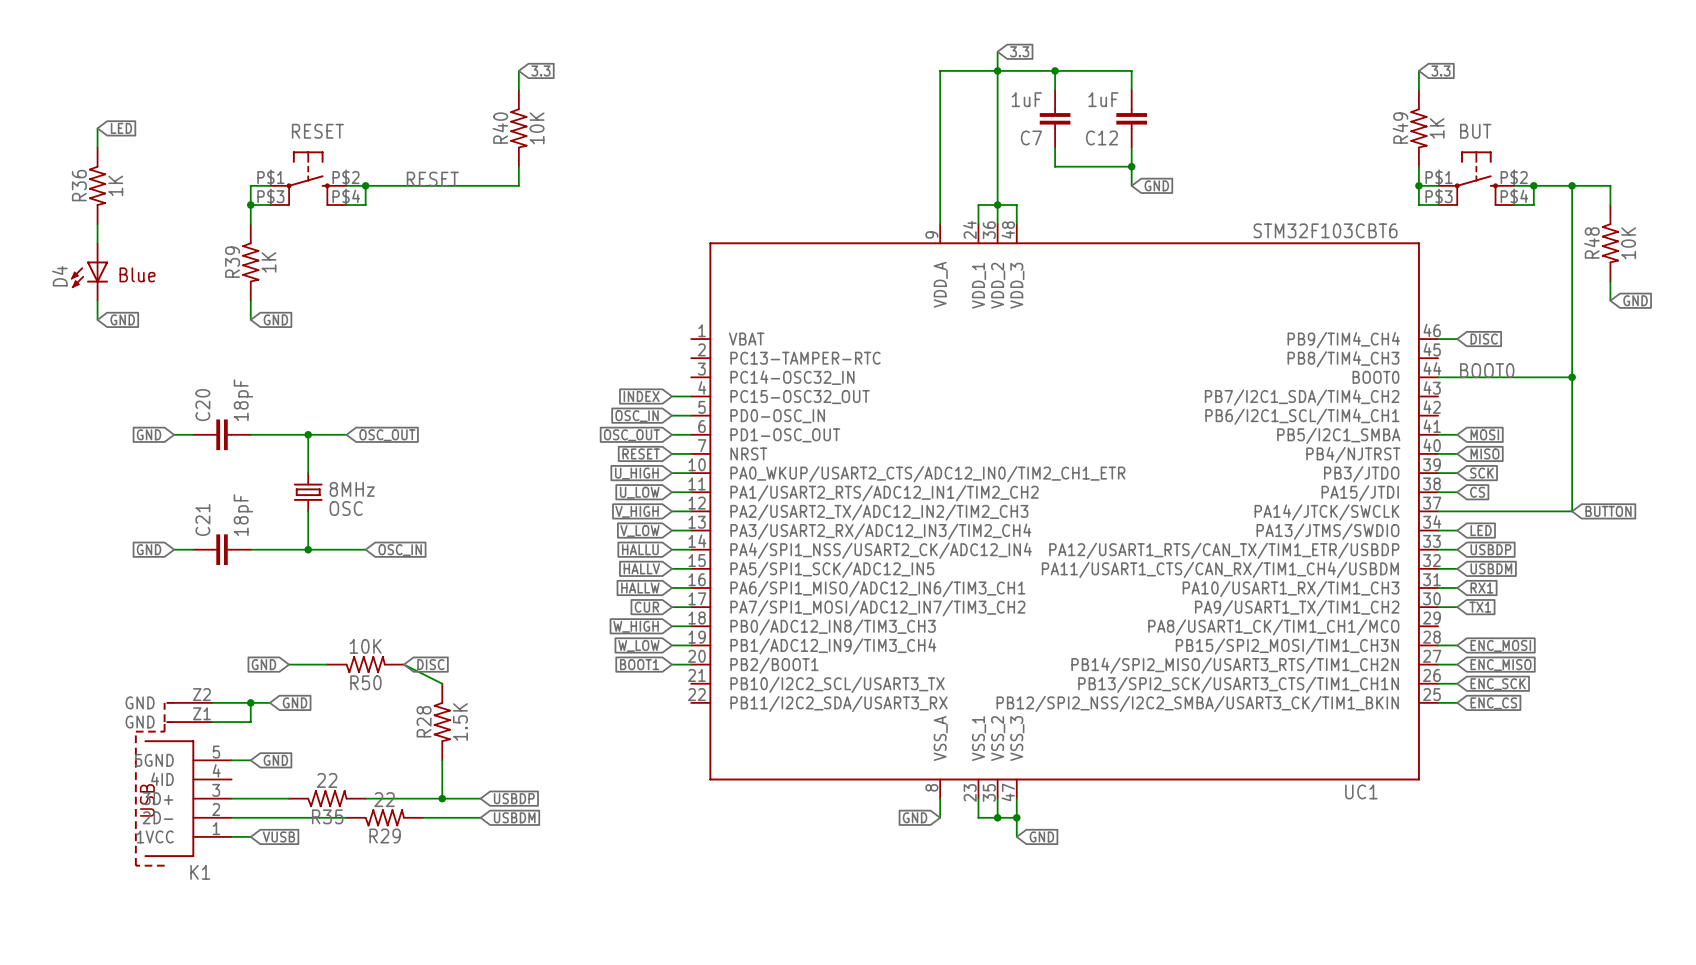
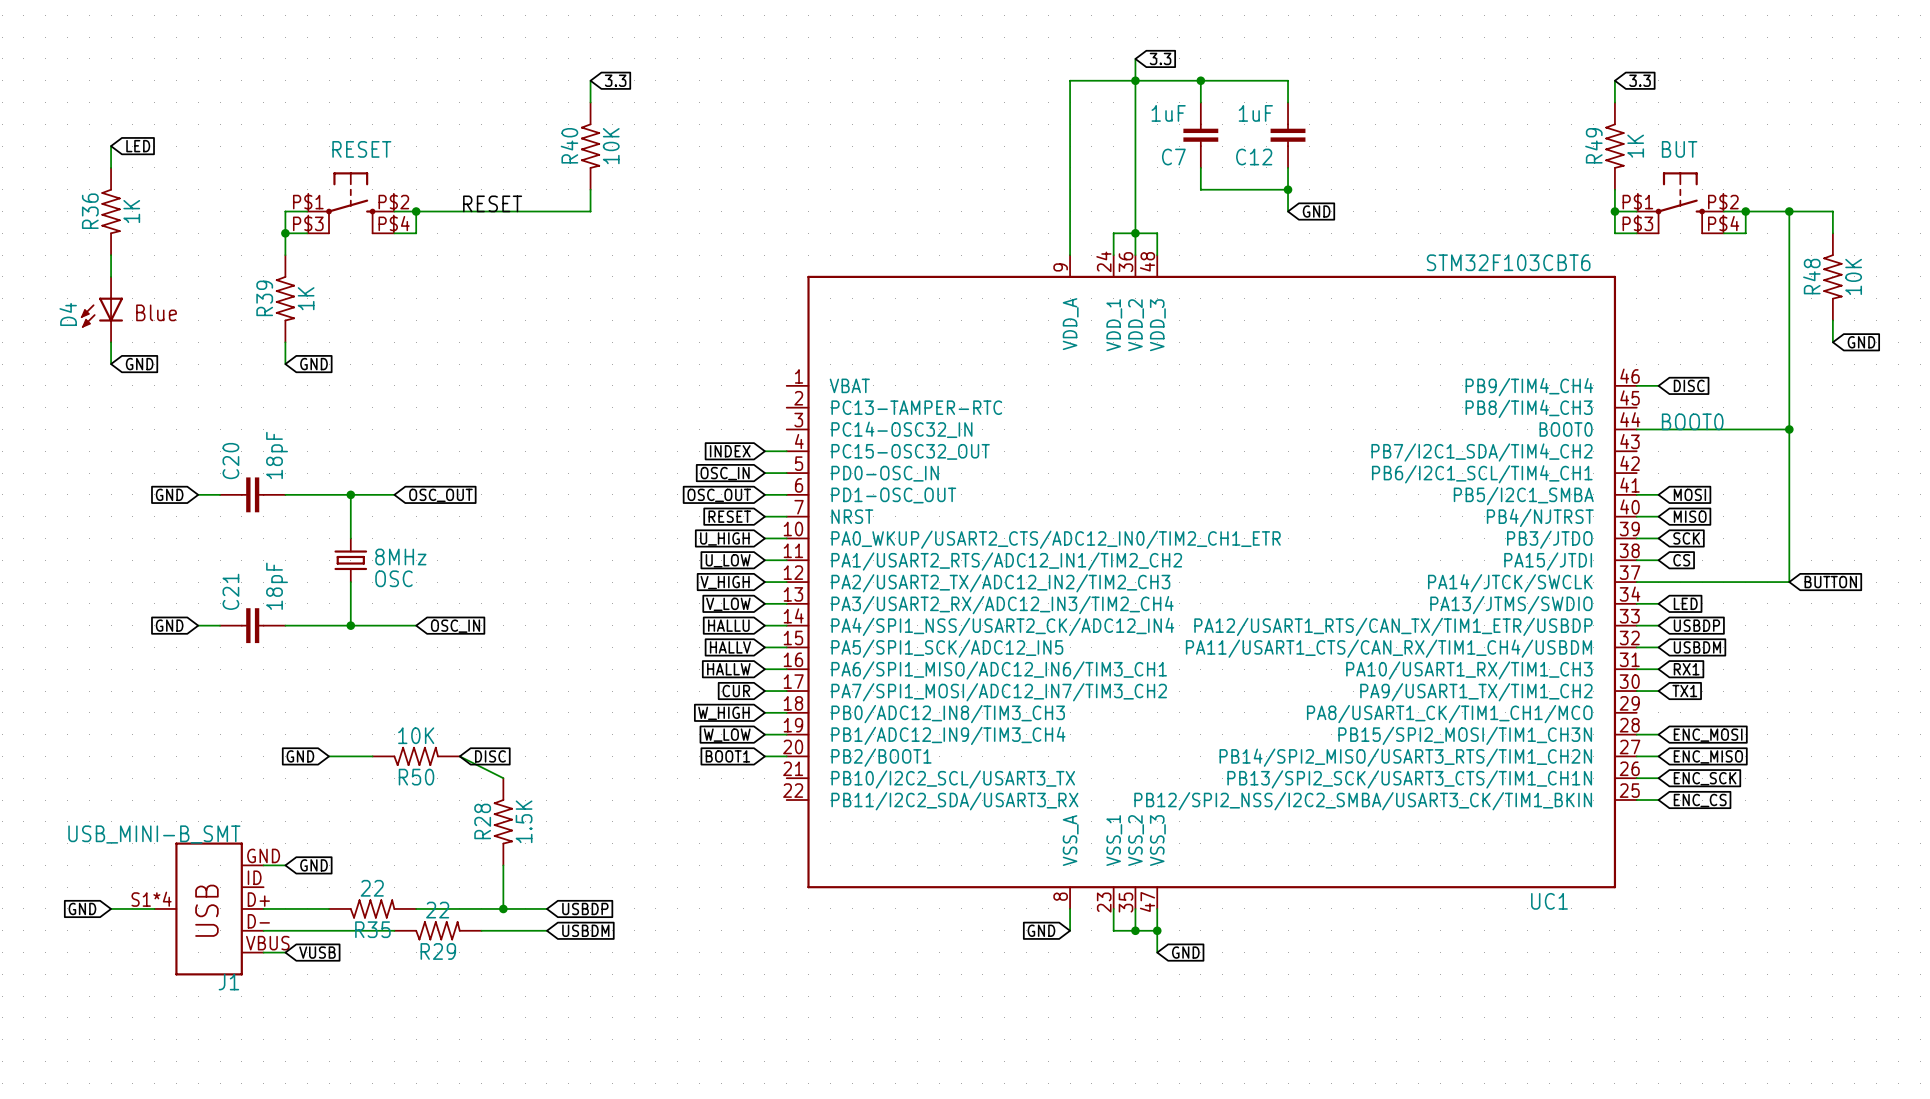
wire: (212, 702) (269, 702) -> none
wire: (250, 702) (250, 722) (212, 722) -> none
junction: (250, 702) -> none
global label: GND (295, 702) -> none
K1: (183, 784) -> none
global label: none -> GND (82, 908)
wire: none -> (111, 908) (154, 908)
J1: none -> USB_MINI-B_SMT (209, 908)

